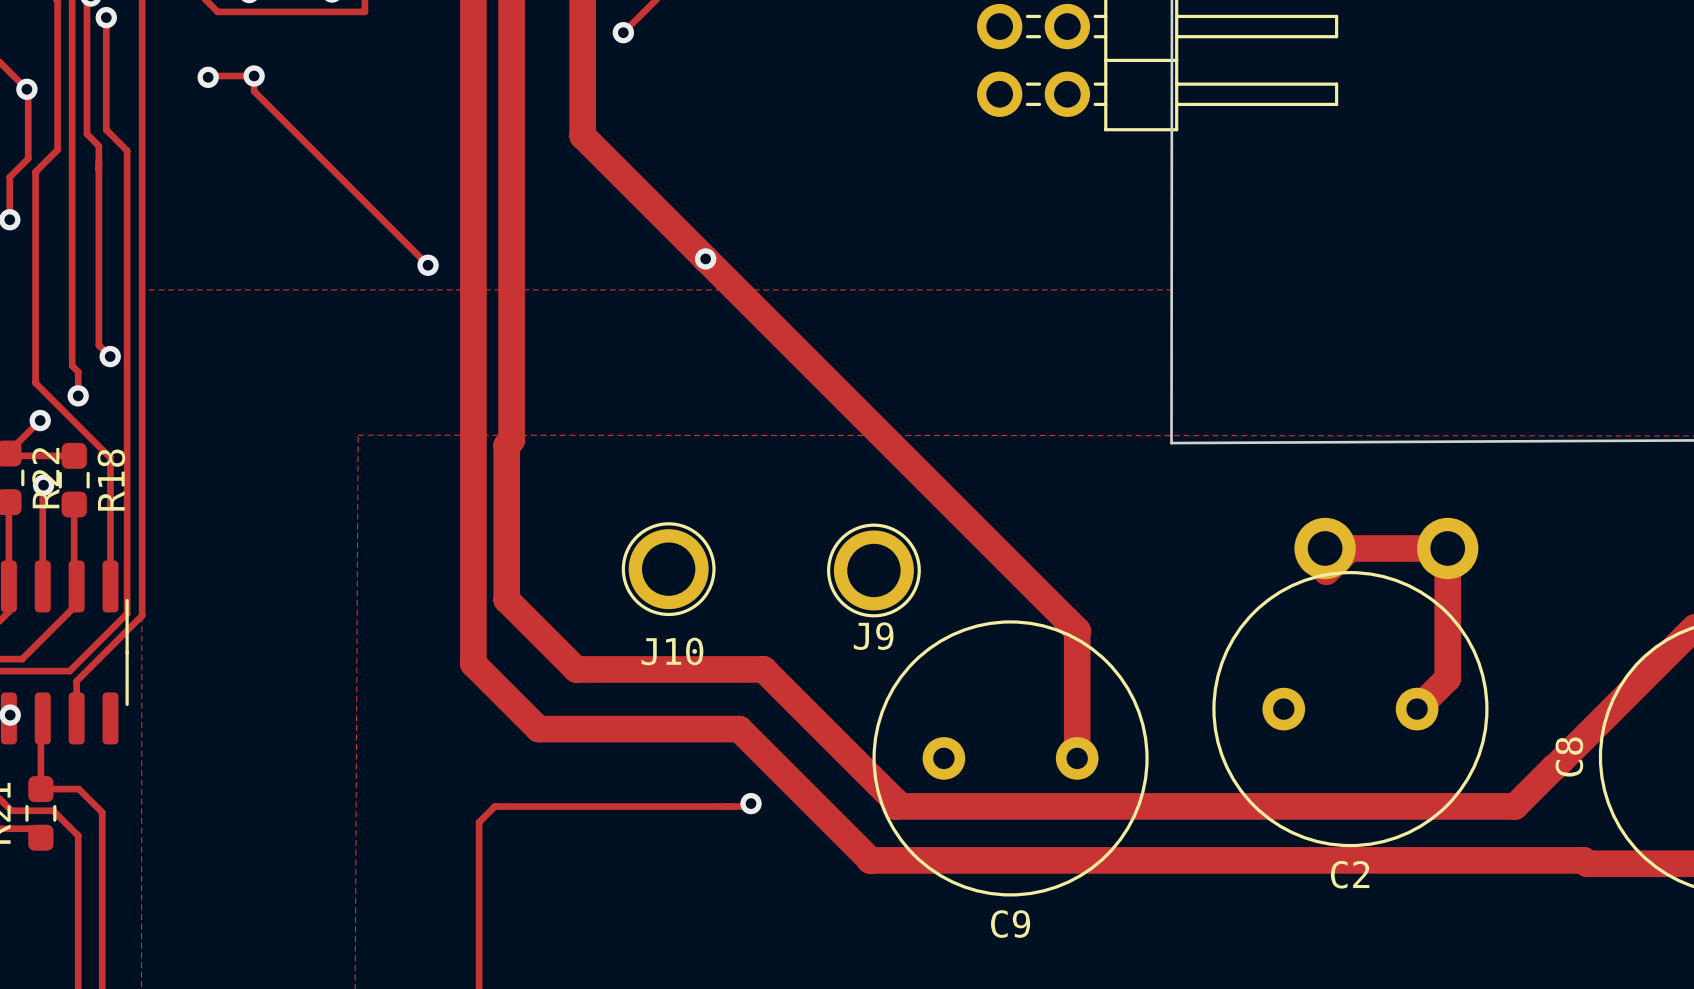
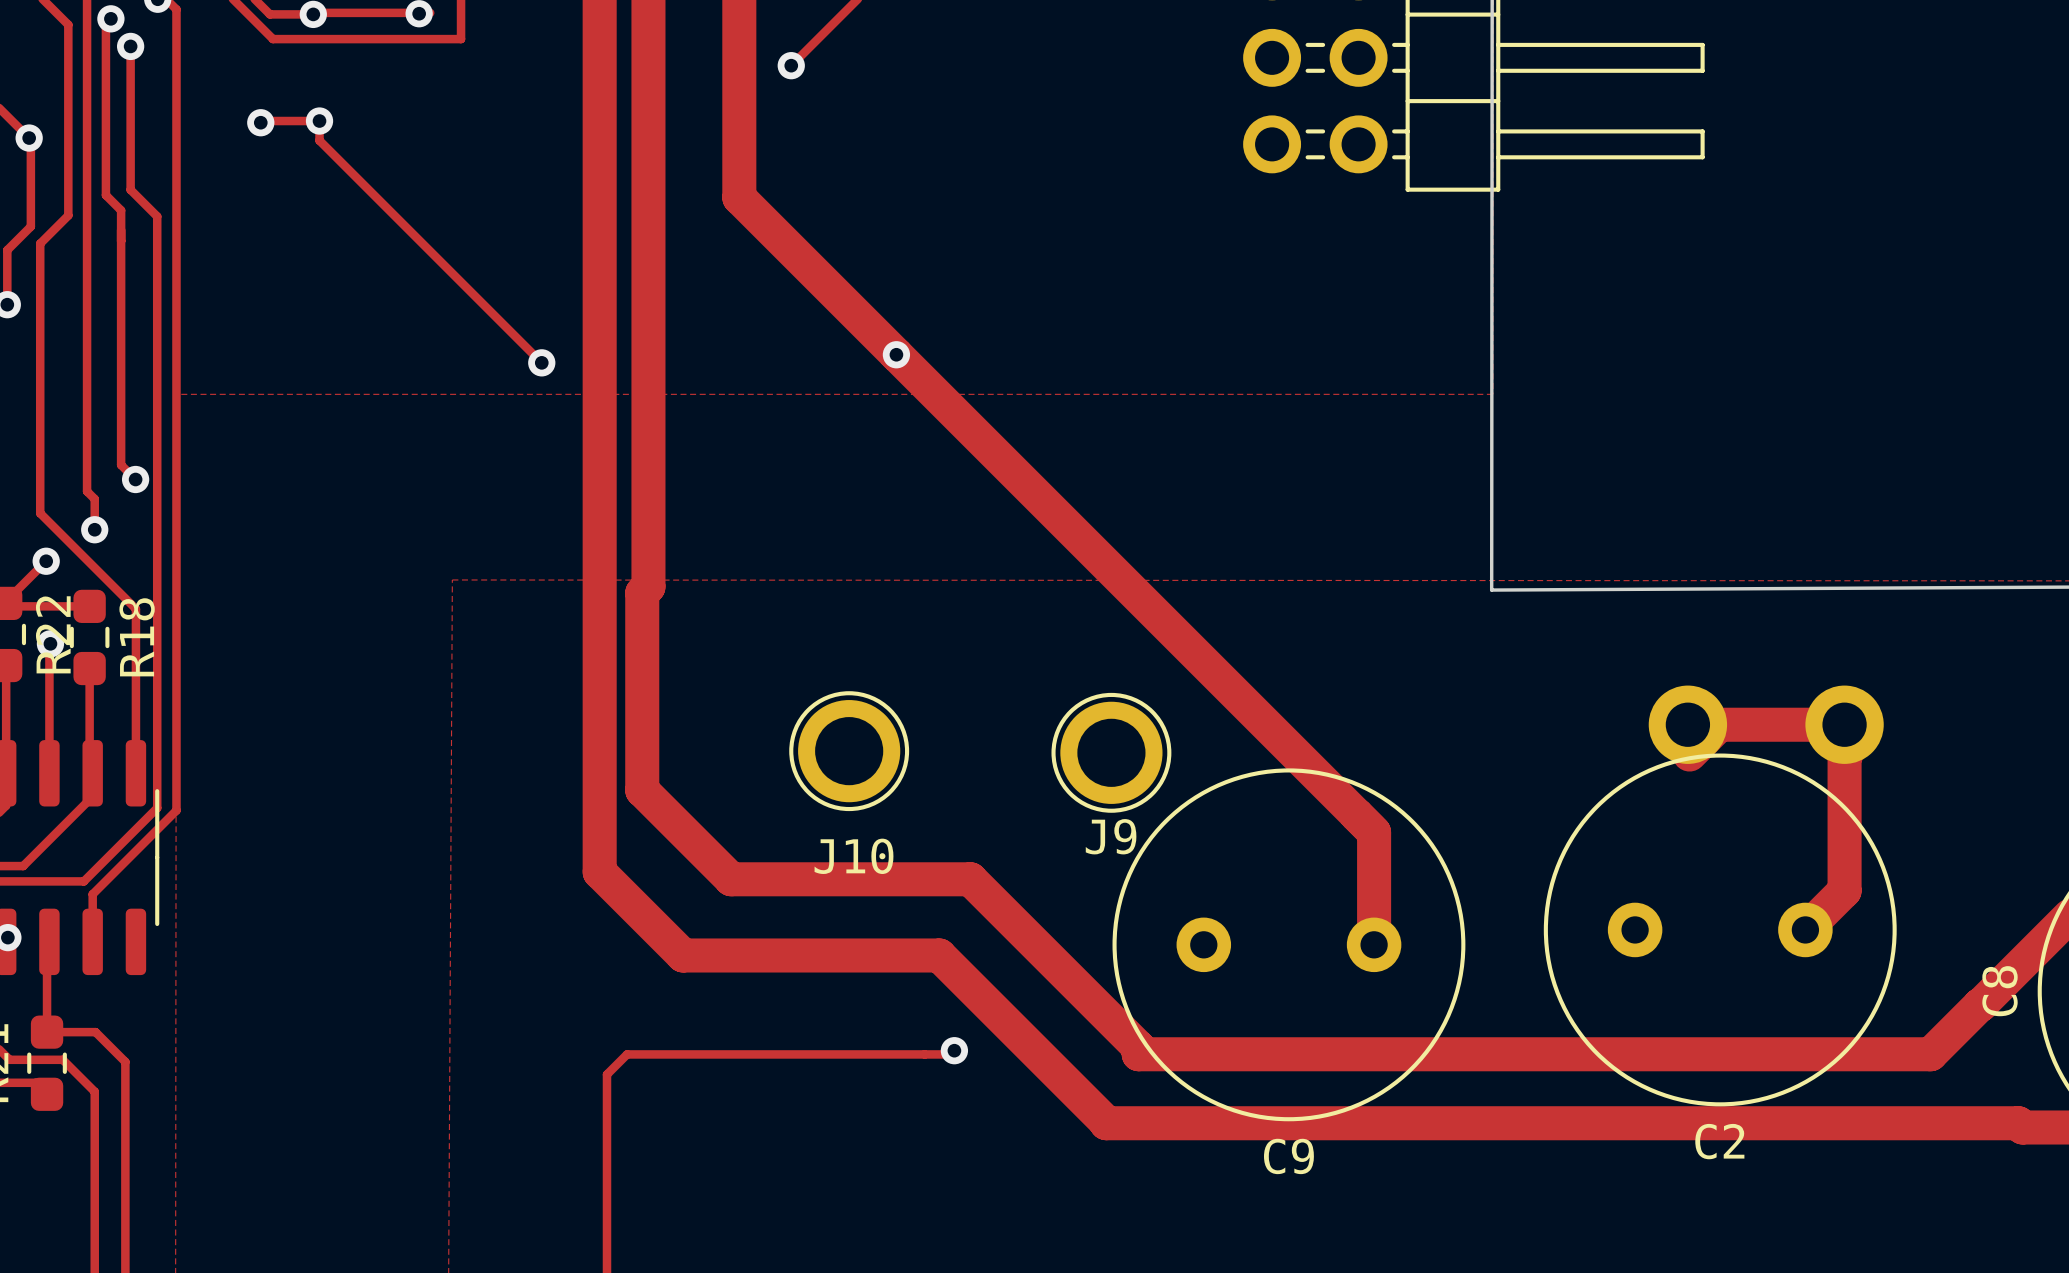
track: (1077, 630) (1077, 758) -> (1371, 830) (1374, 832) (1374, 944)
C9 position: (1010, 758) -> (1288, 944)

